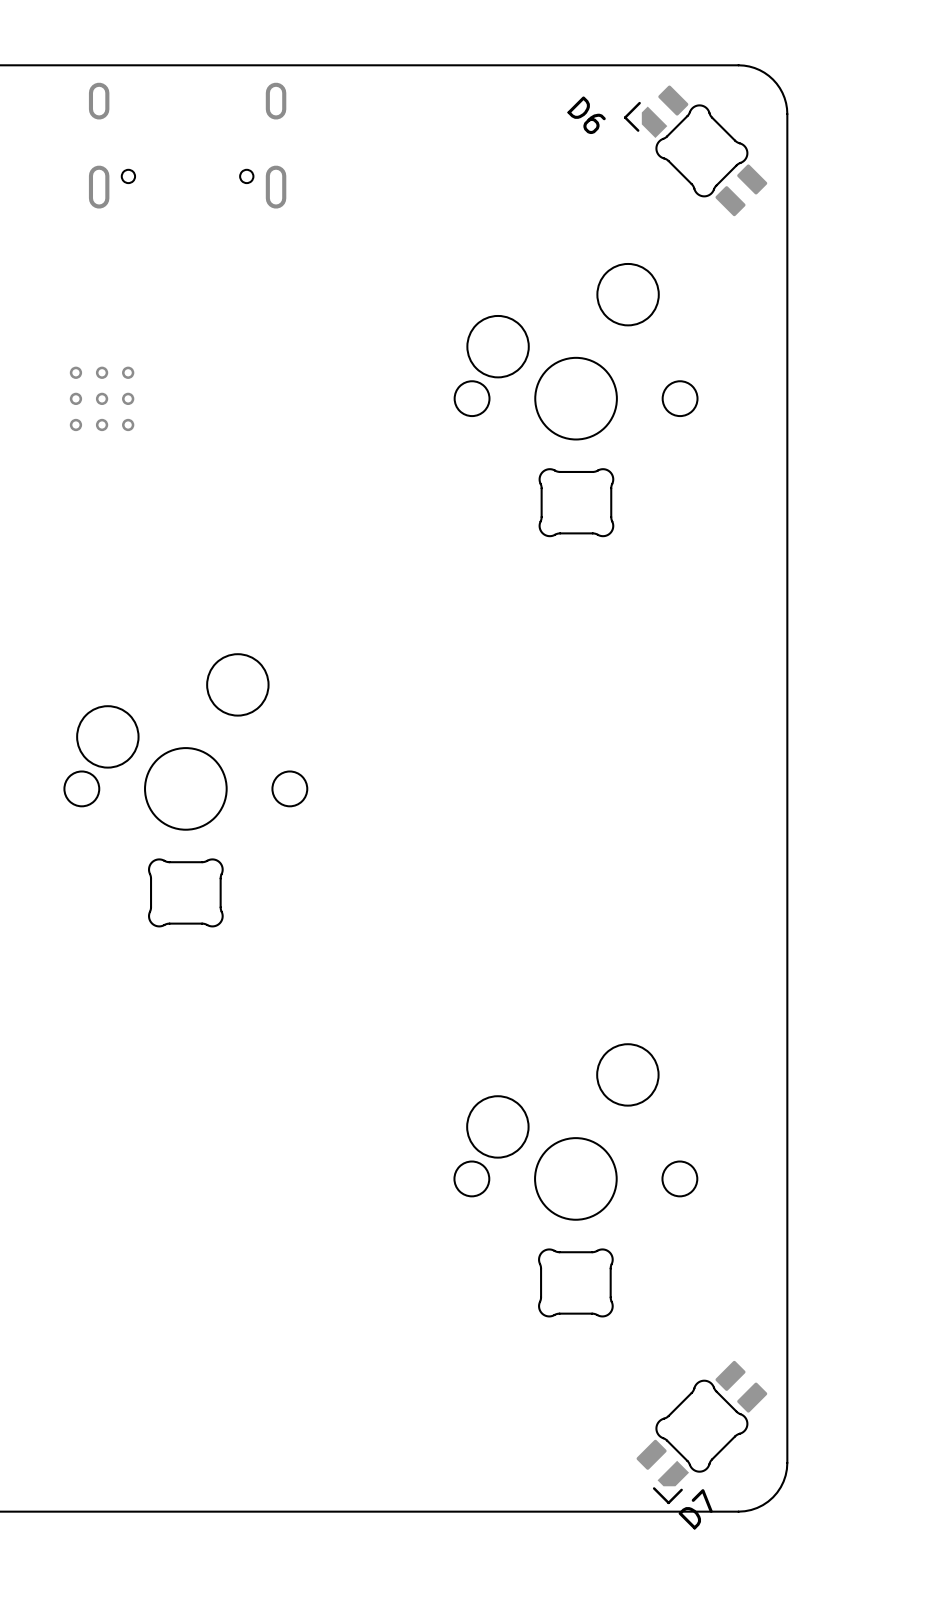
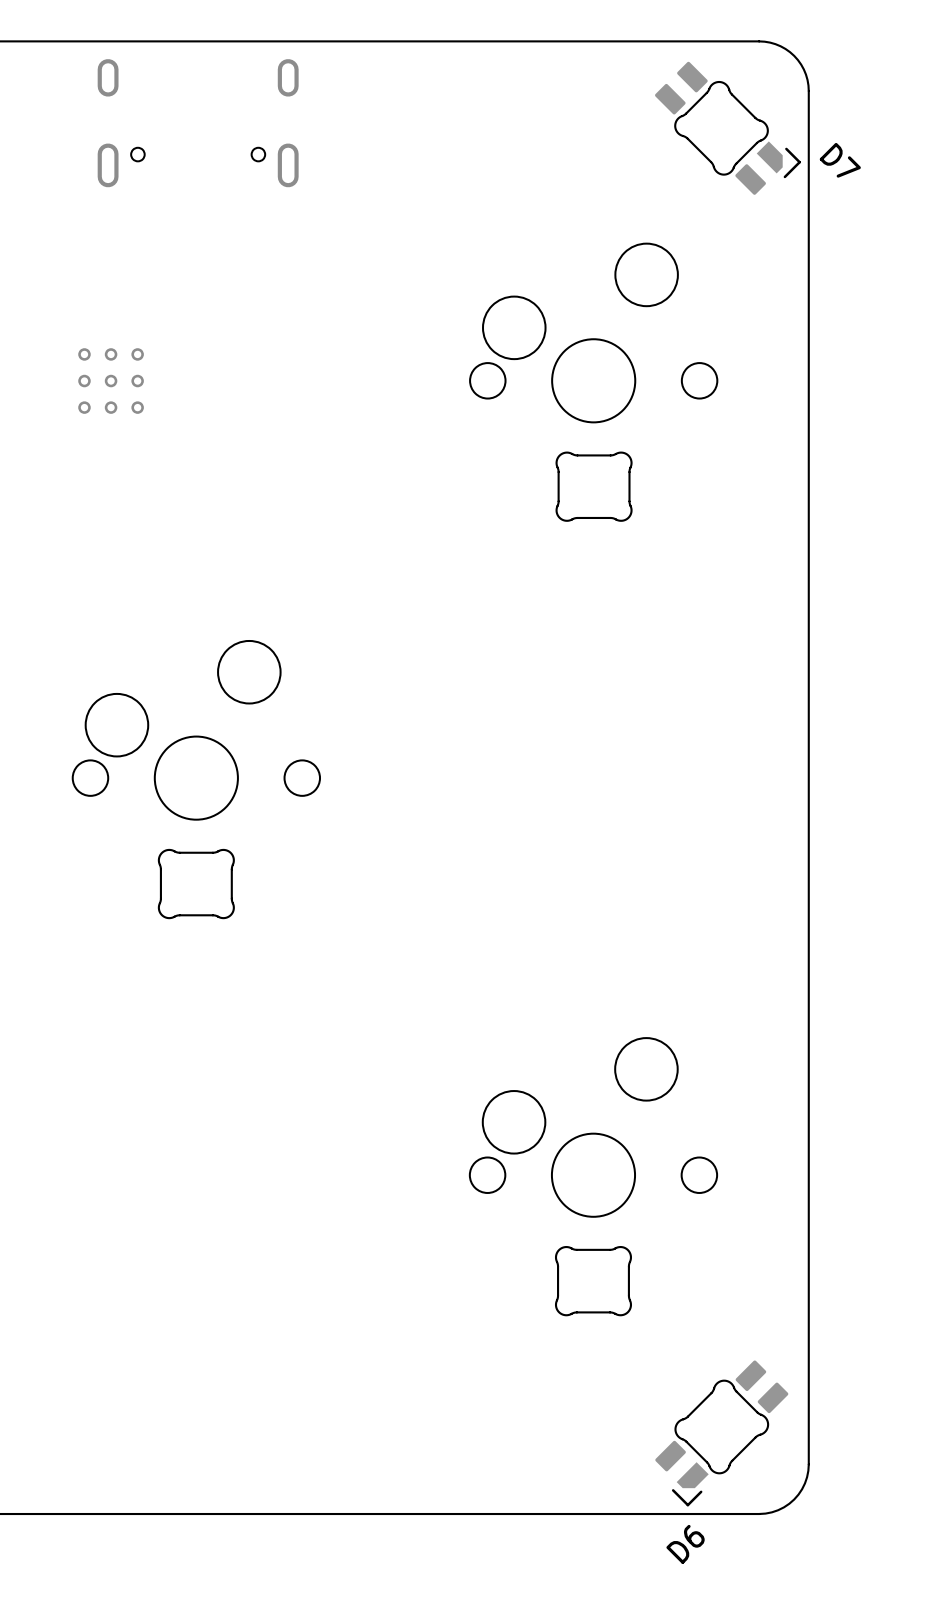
D6: (695, 150) -> none
D7: none -> (727, 128)
D7 name: D7 (695, 1509) -> D6 (685, 1544)

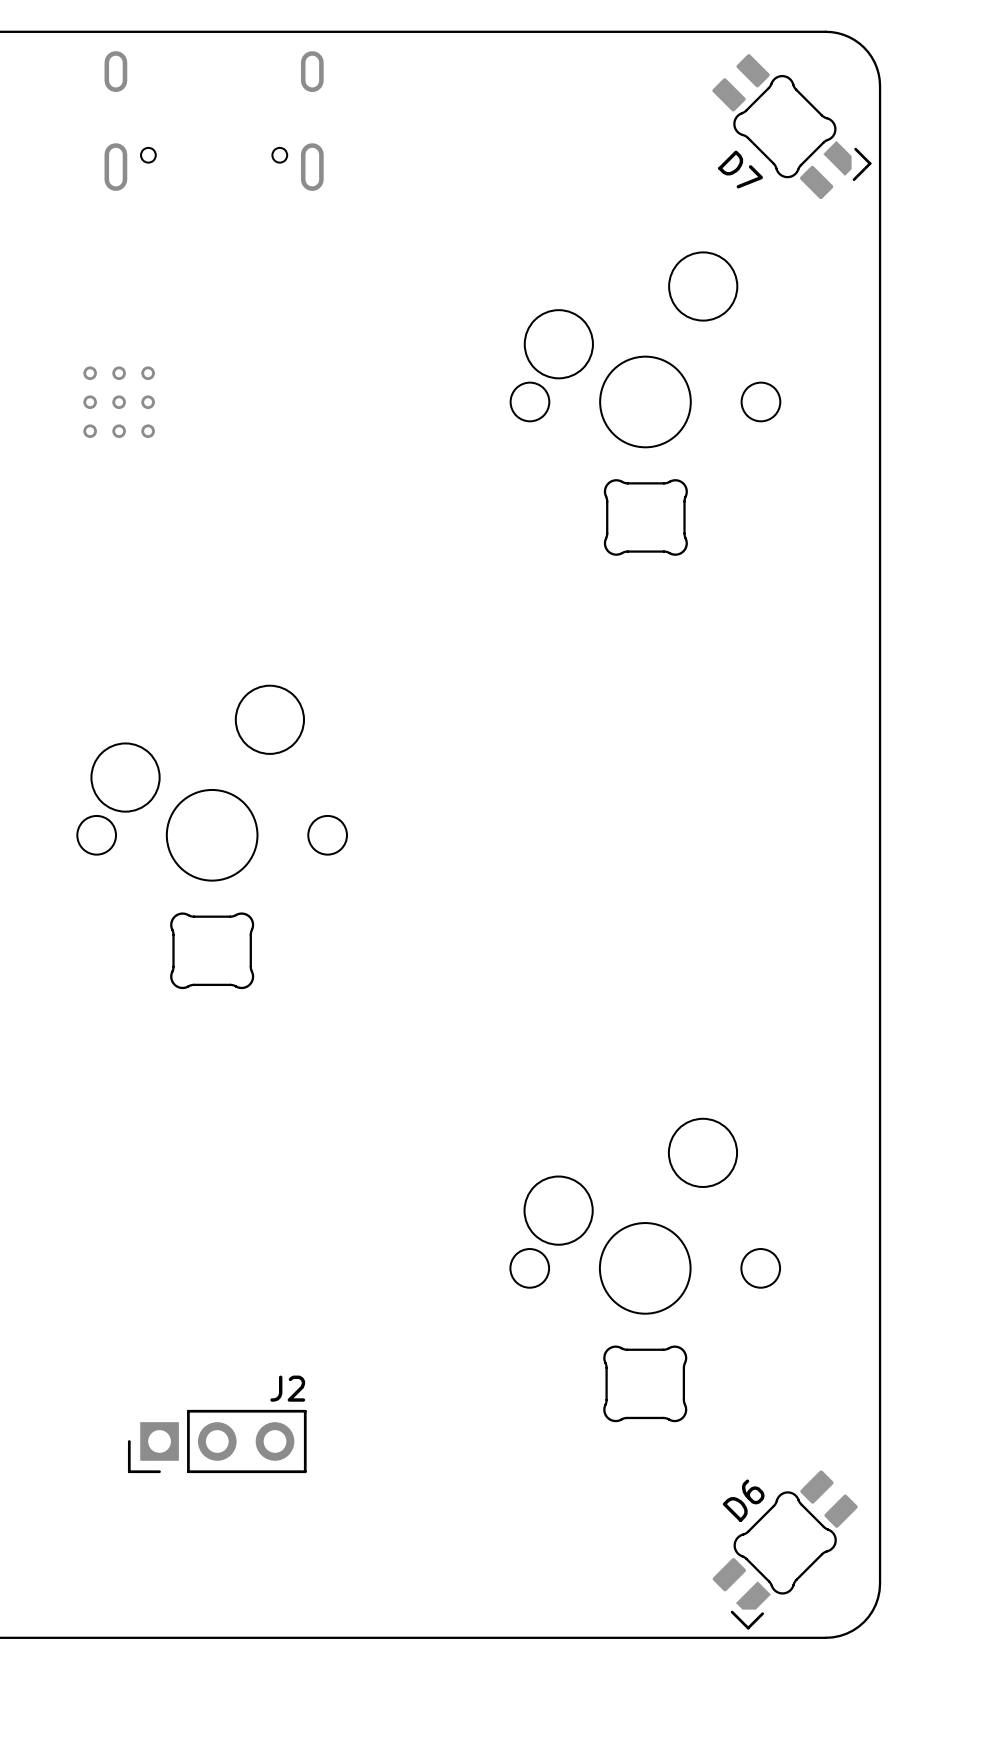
D7 name position: D7 (840, 160) -> D7 (740, 169)
J2: none -> (217, 1441)
D6 name position: D6 (685, 1544) -> D6 (743, 1500)

